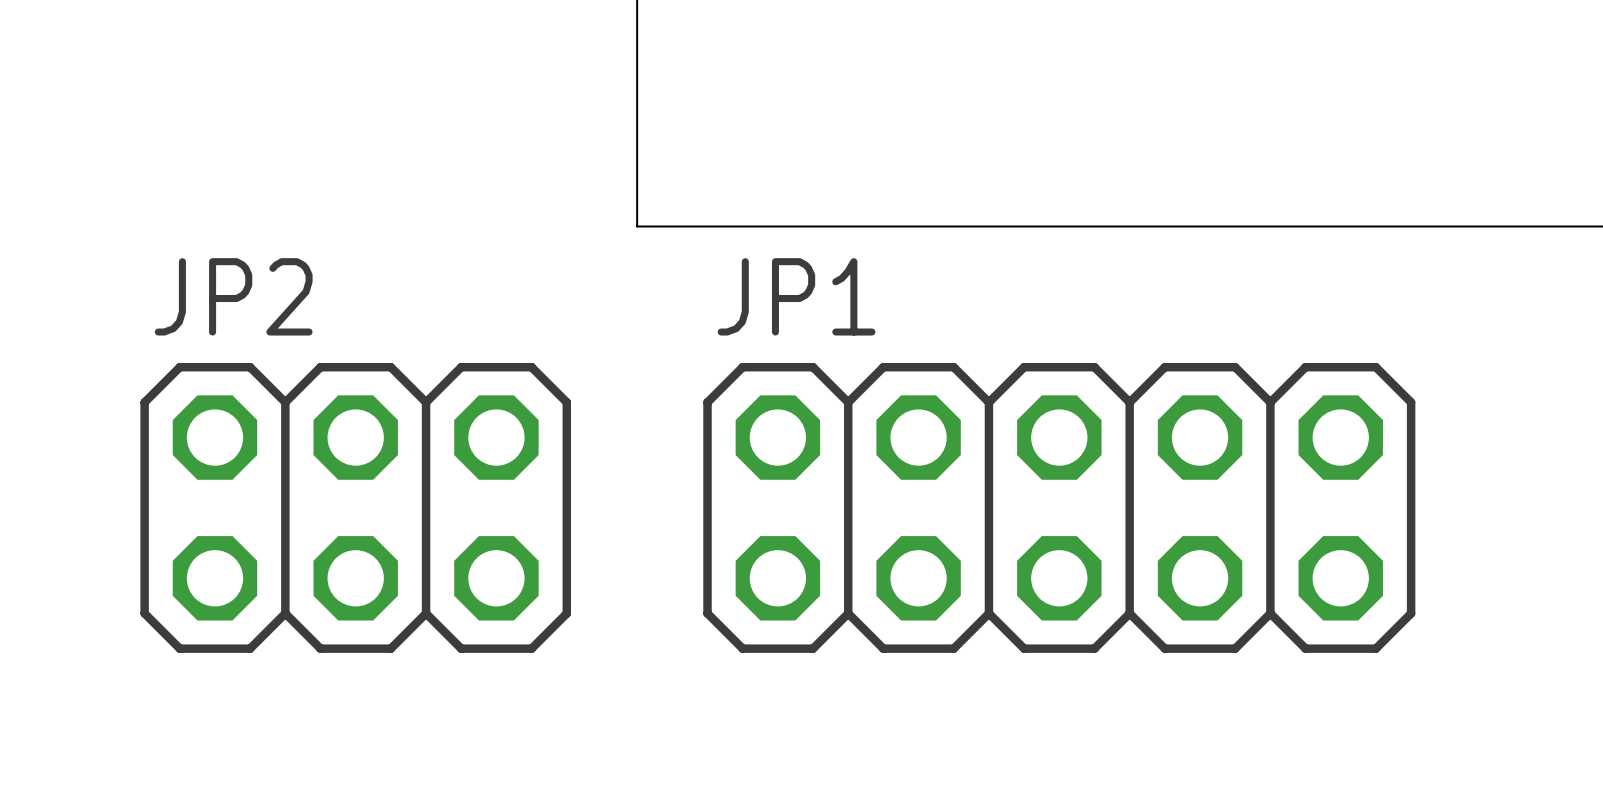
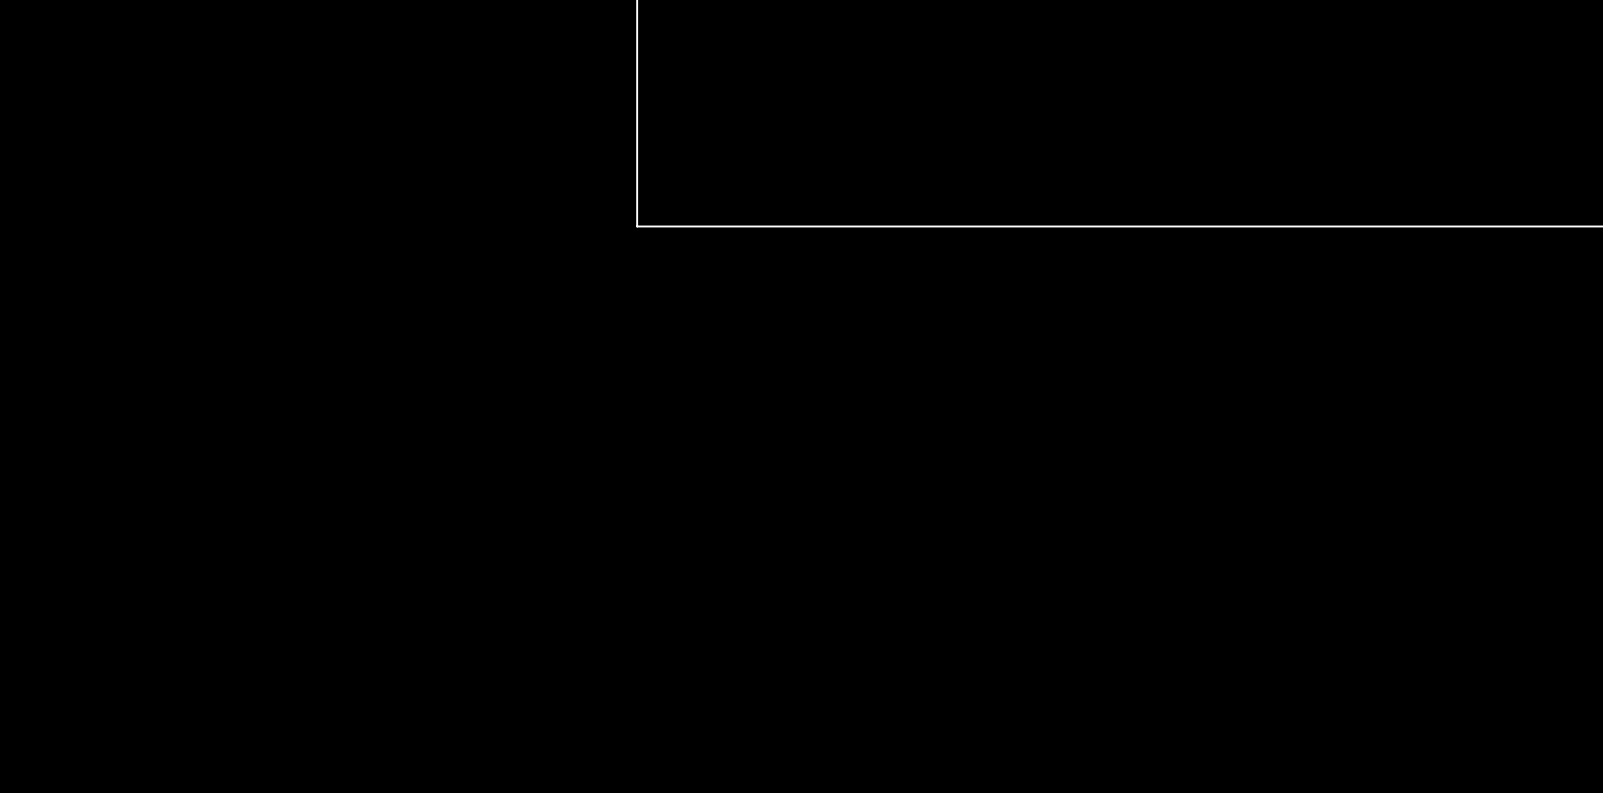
JP2: (355, 507) -> none
JP1: (1059, 507) -> none

